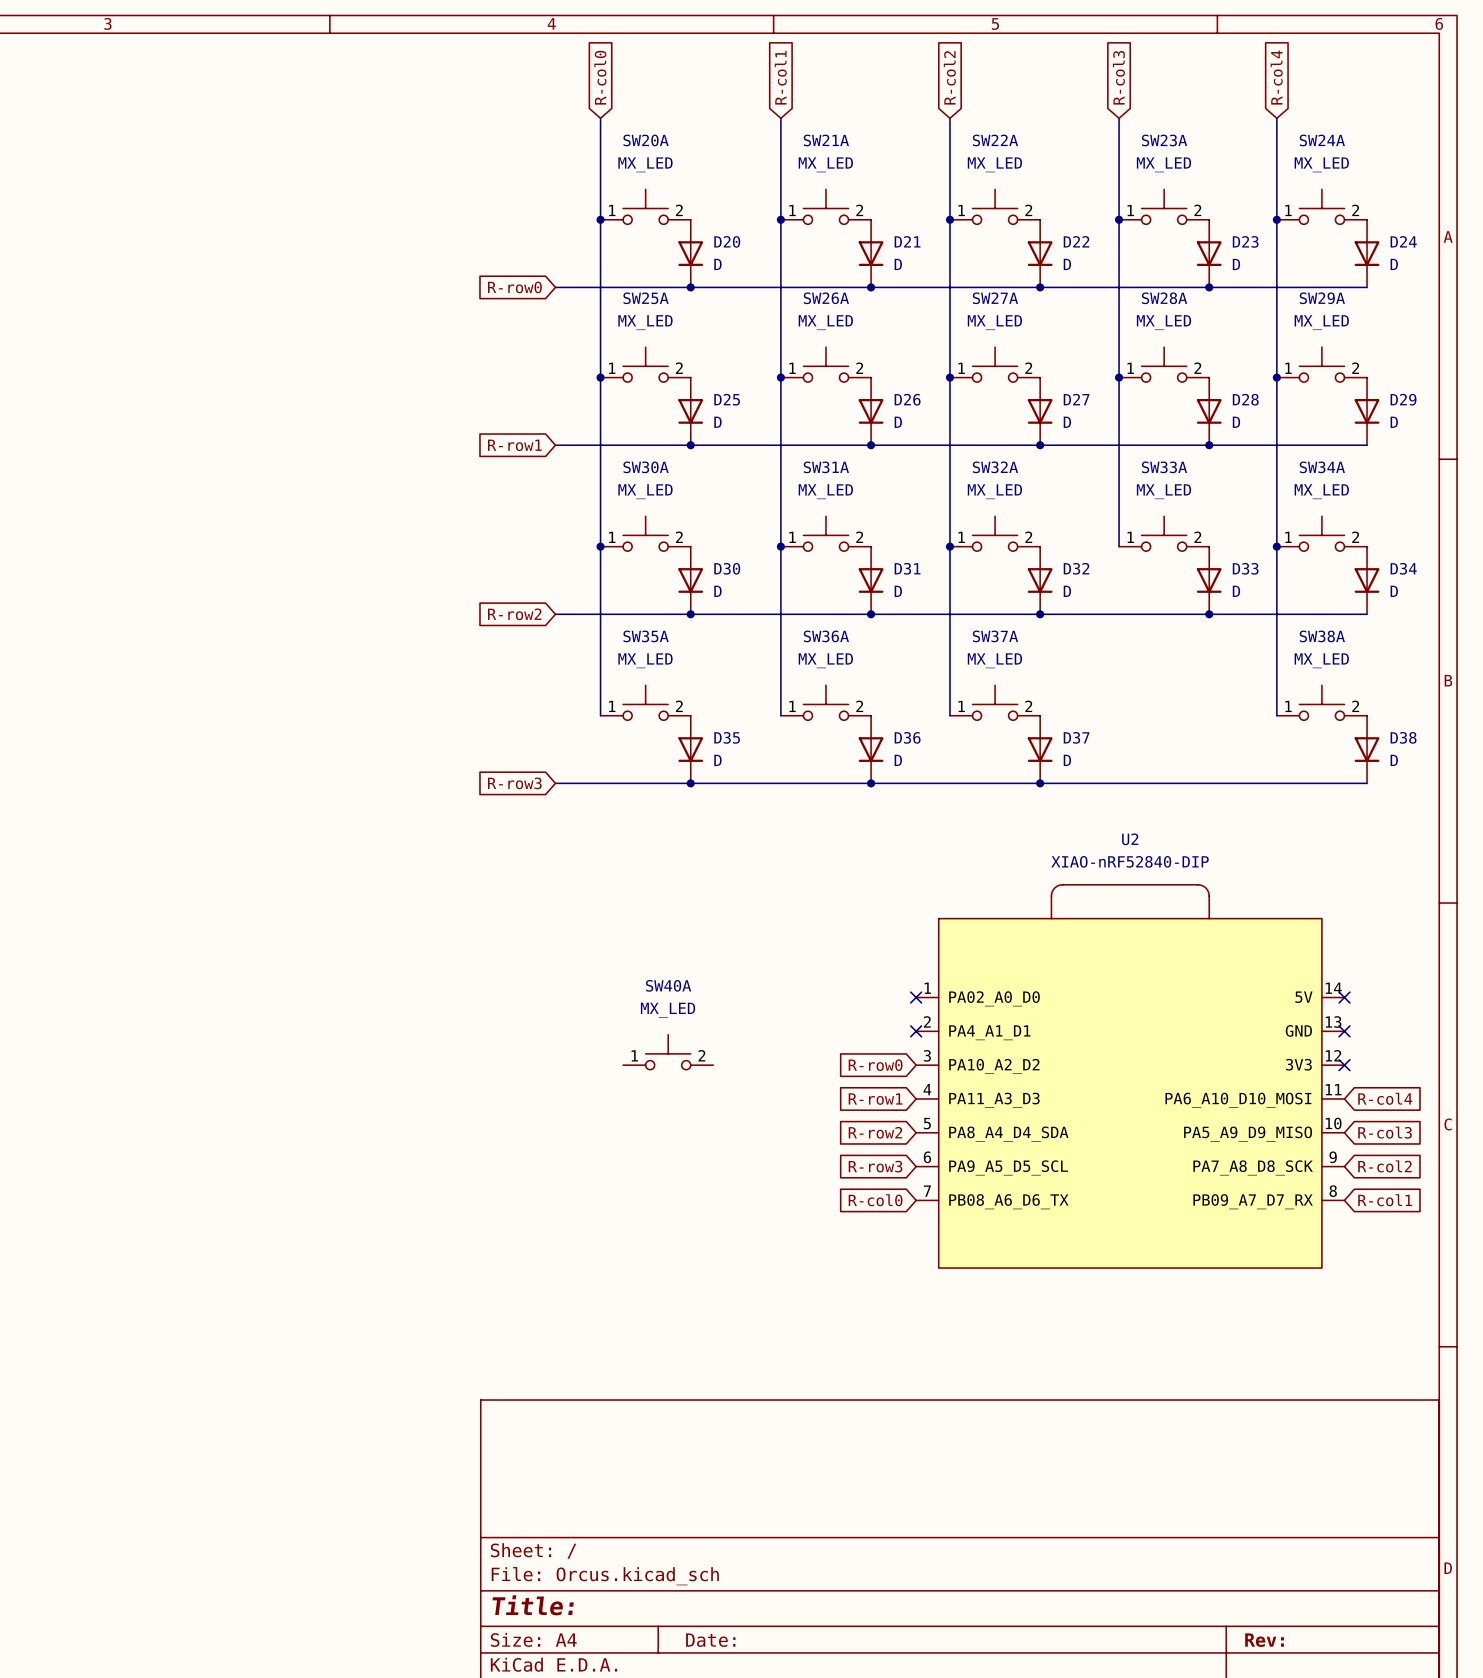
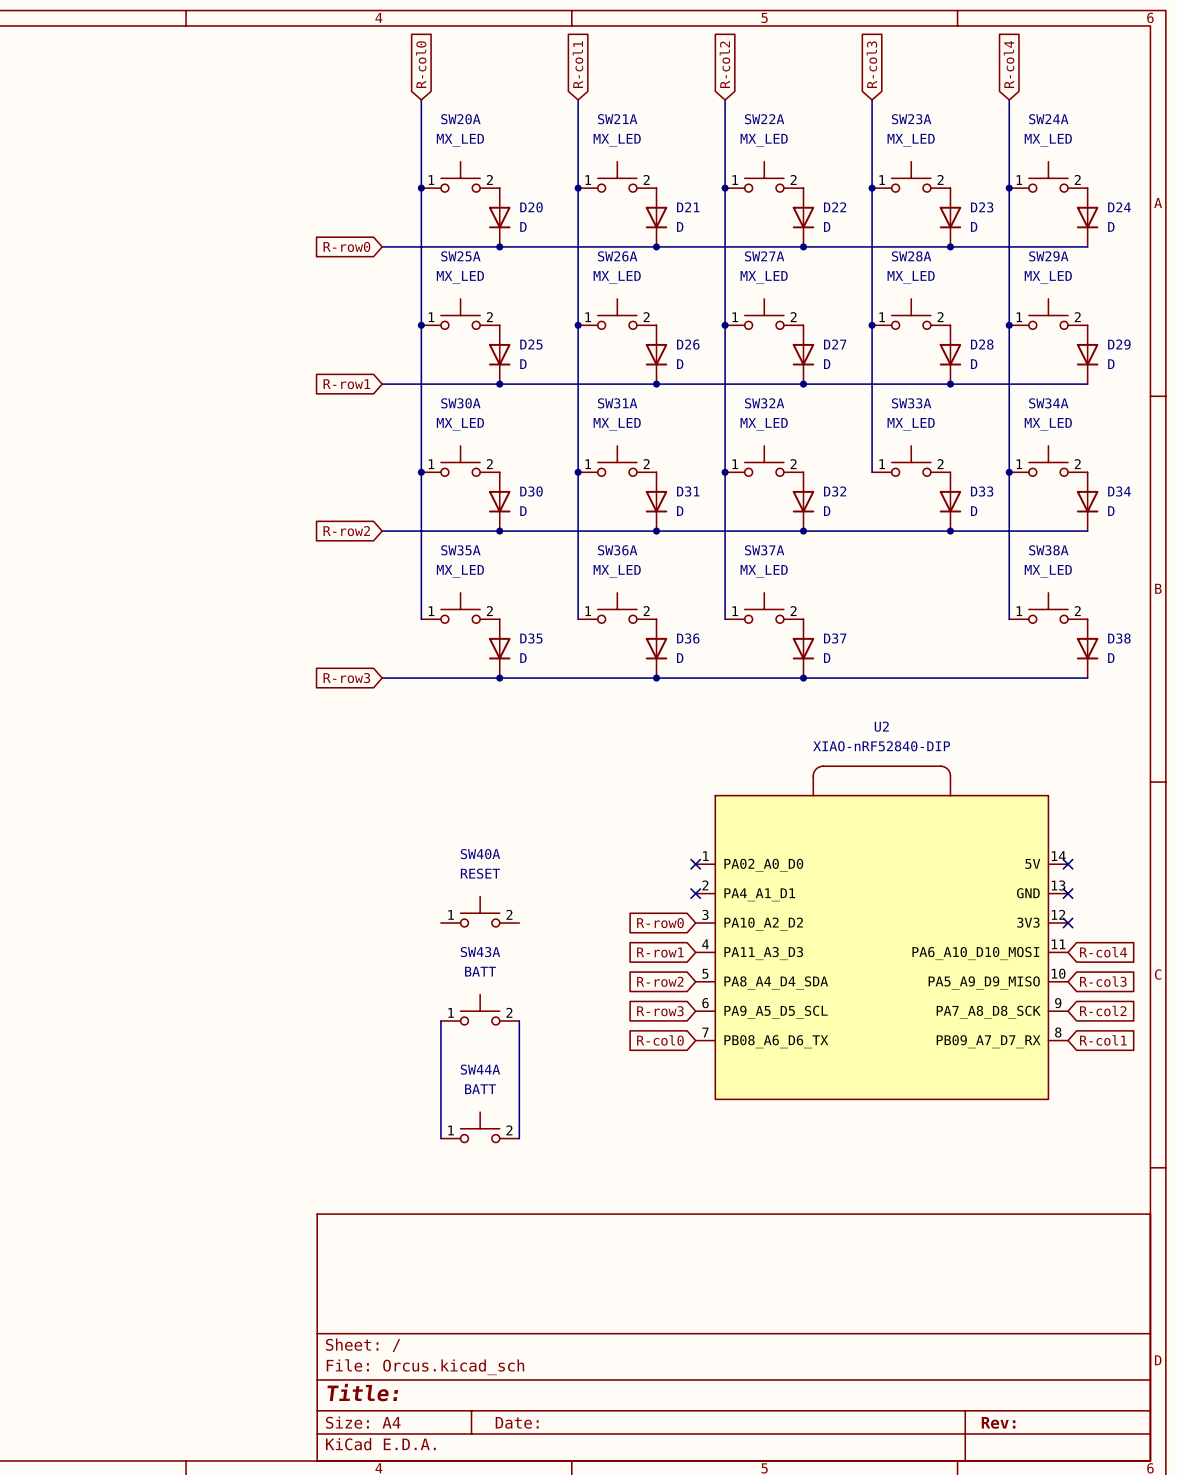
SW40A value: MX_LED (668, 1010) -> RESET (480, 873)
SW43A: none -> BATT (480, 1009)
wire: none -> (440, 1020) (440, 1138)
wire: none -> (519, 1020) (519, 1138)
SW44A: none -> BATT (480, 1127)

